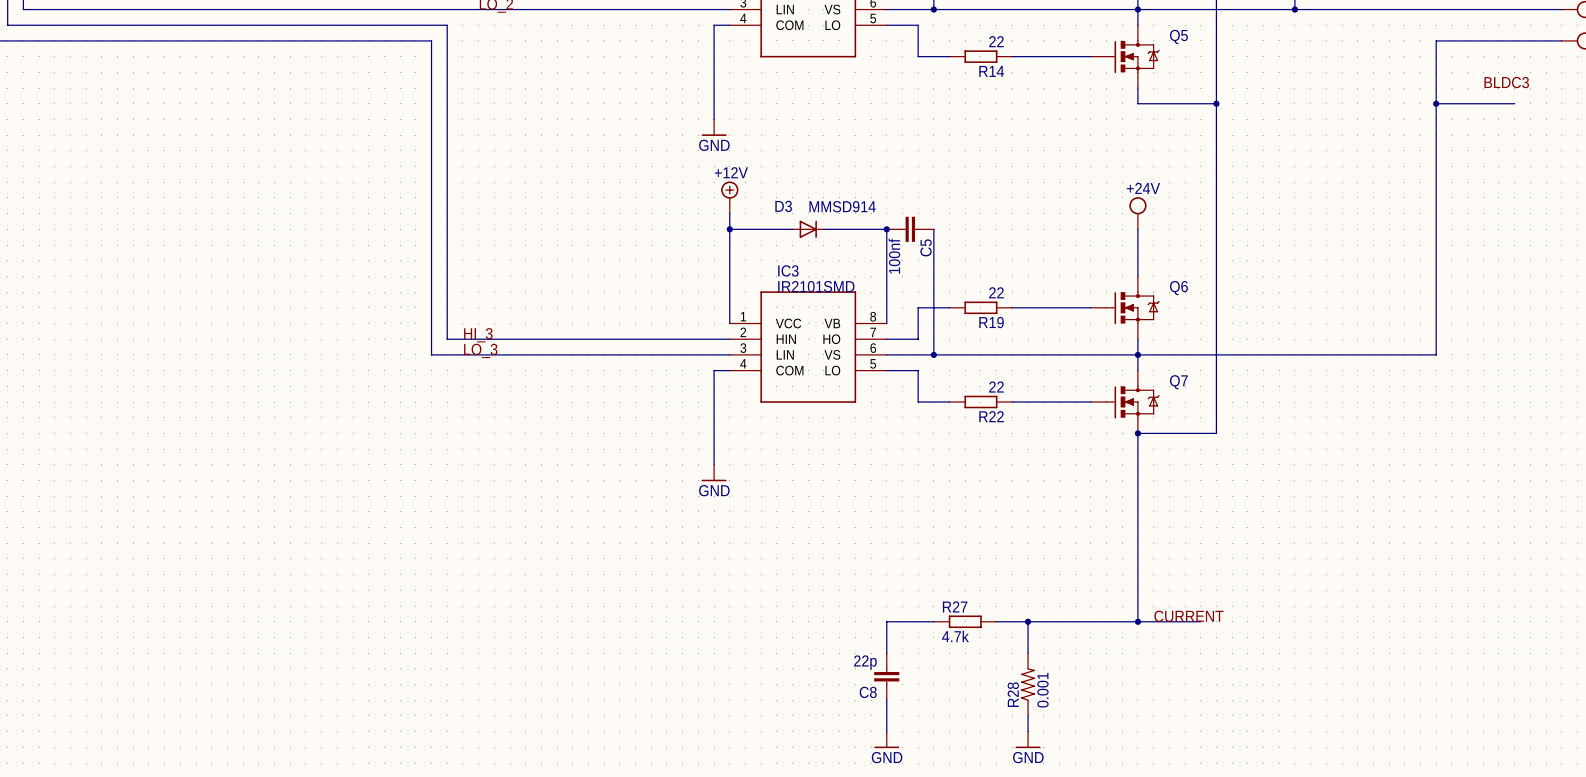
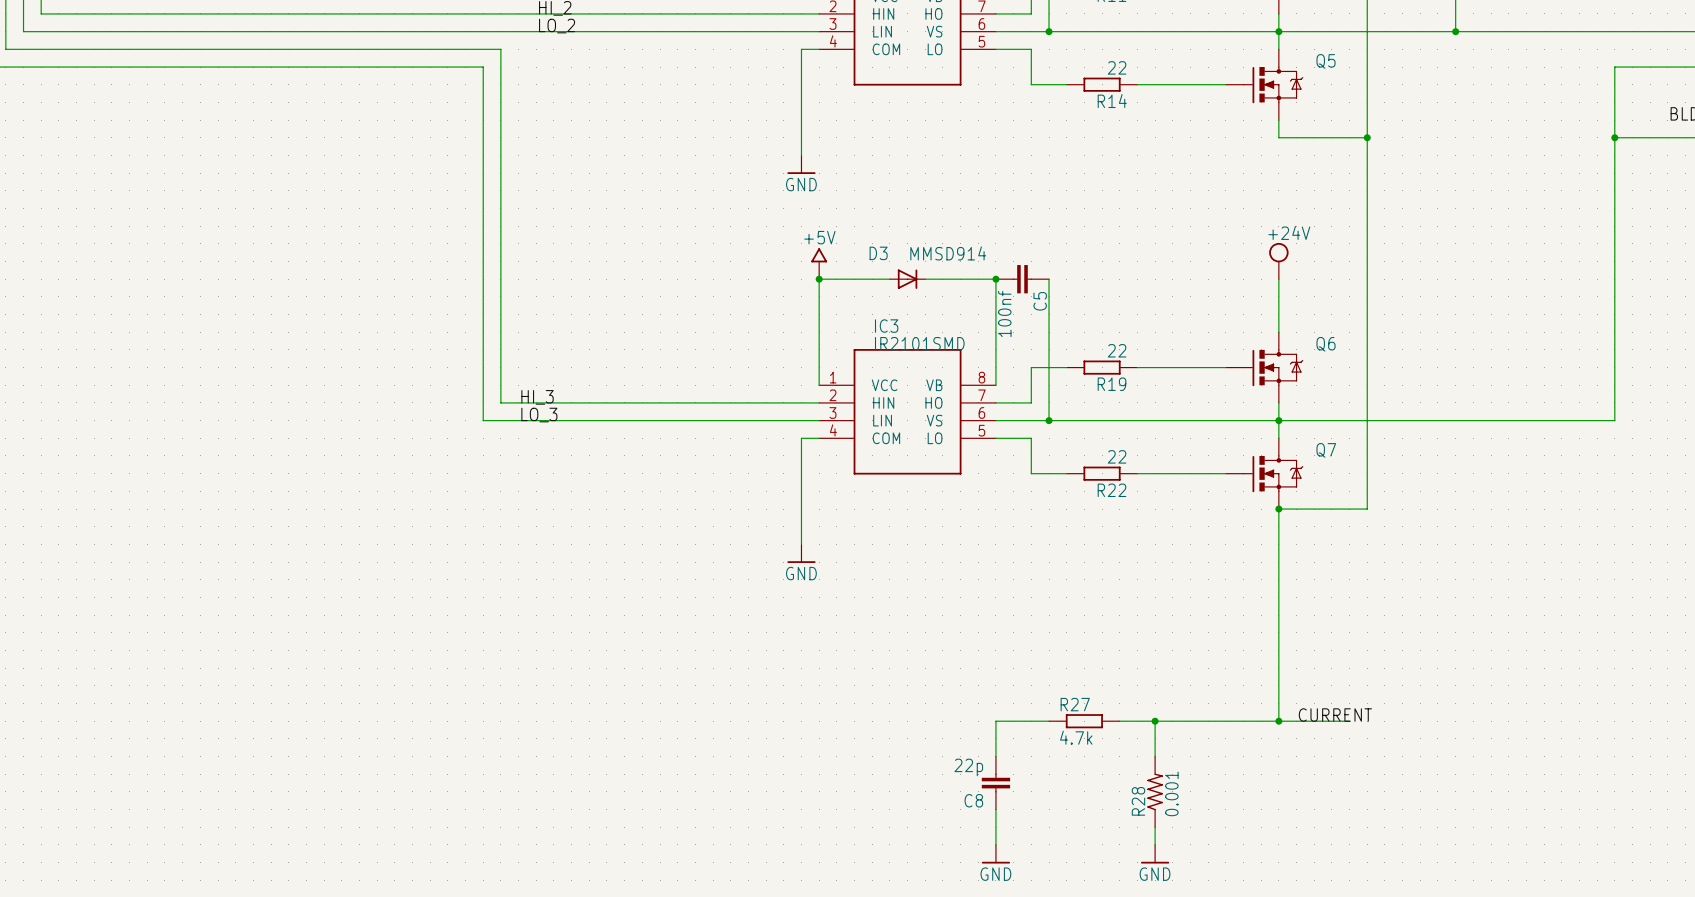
power symbol: +12V (729, 197) -> none
power symbol: none -> +5V (819, 263)

